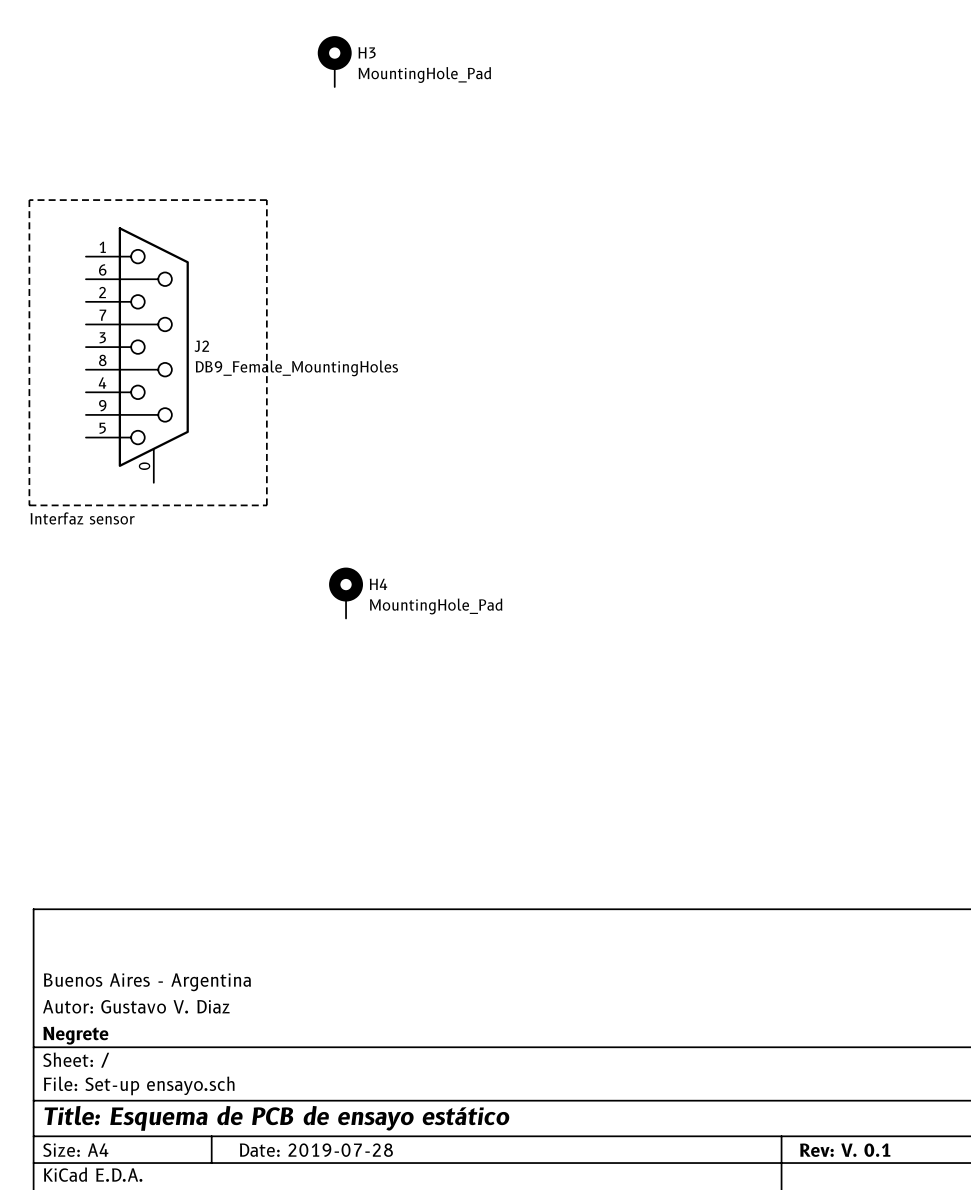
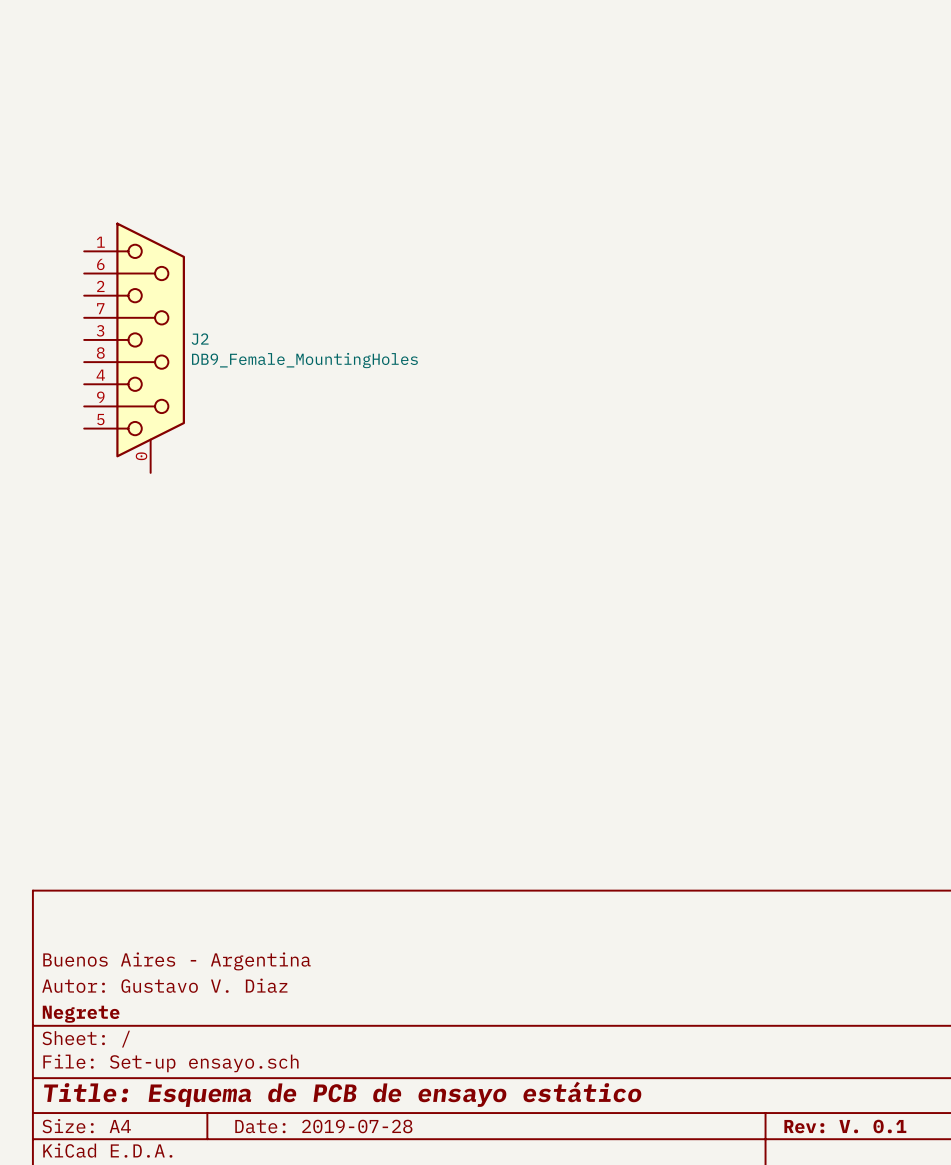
H3: MountingHole_Pad (334, 61) -> none
line: (29, 200) (29, 505) (266, 505) (266, 200) (29, 200) -> none
text: Interfaz sensor (82, 518) -> none
H4: MountingHole_Pad (346, 593) -> none

